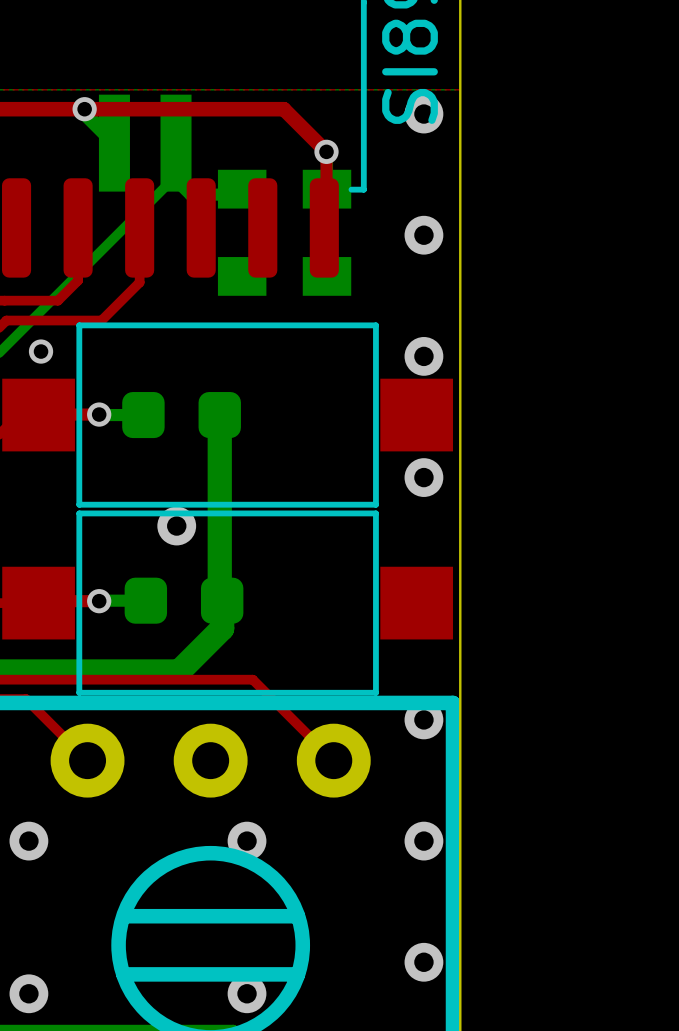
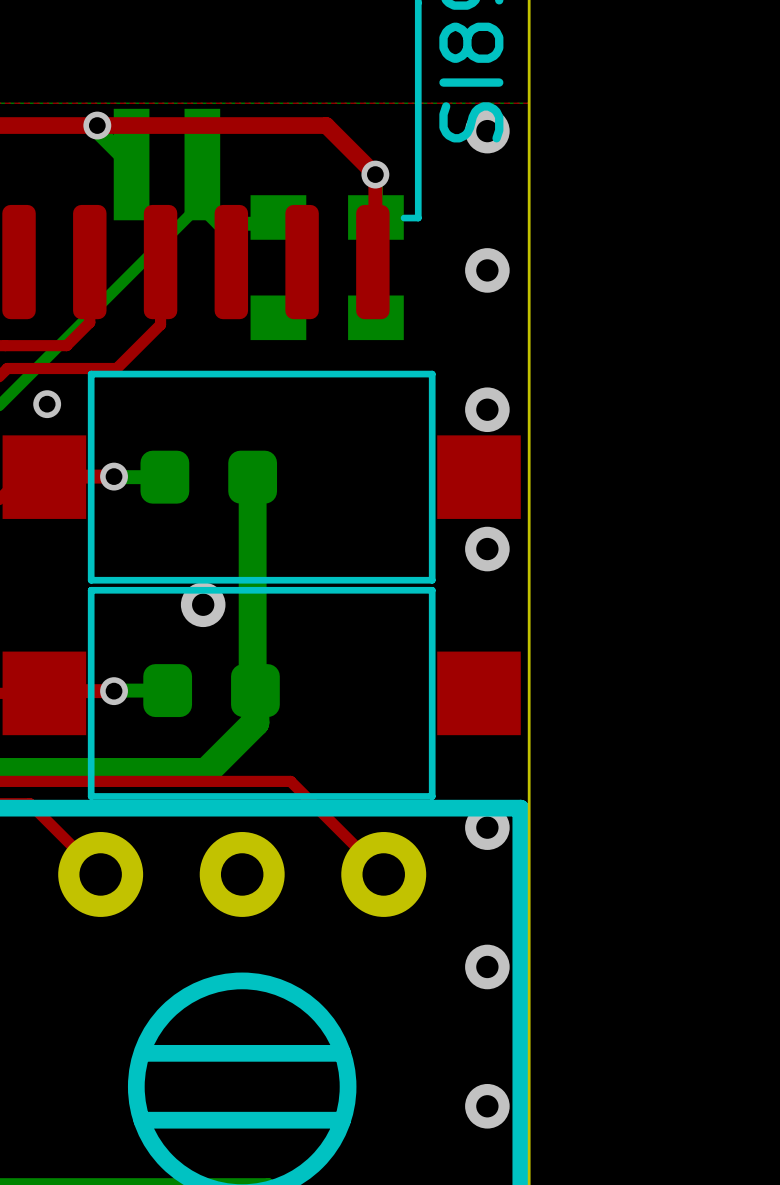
via: (28, 841) -> none
via: (247, 841) -> none
via: (28, 993) -> none
via: (247, 993) -> none

